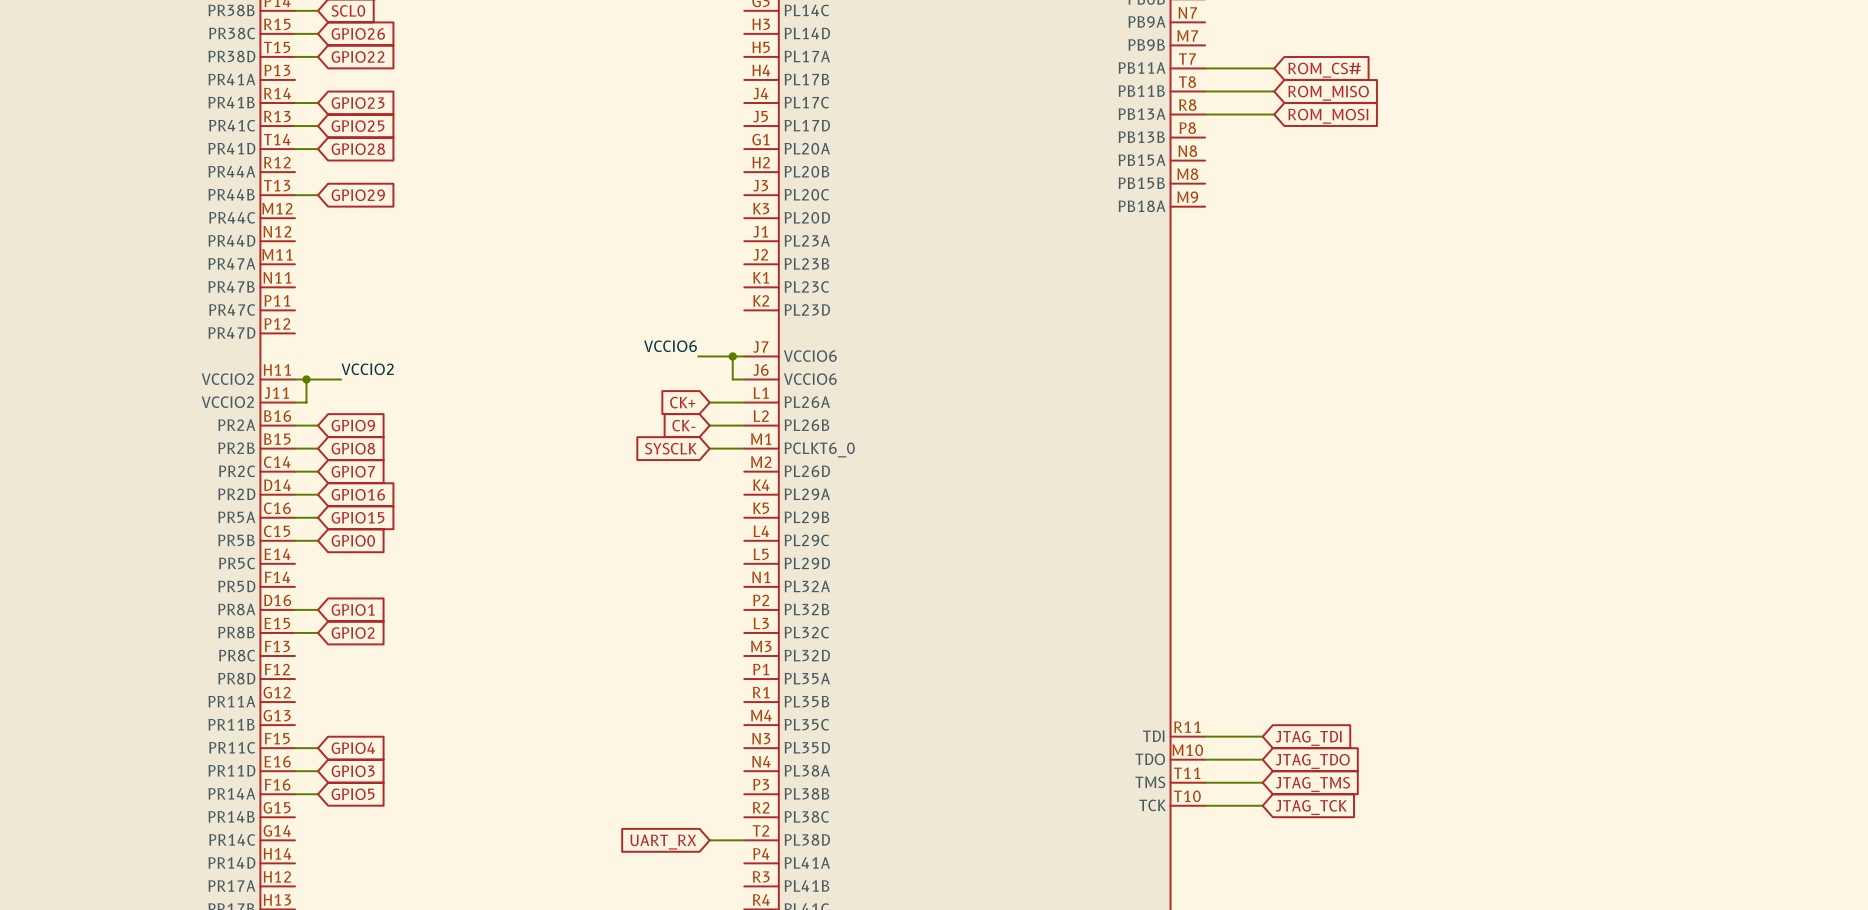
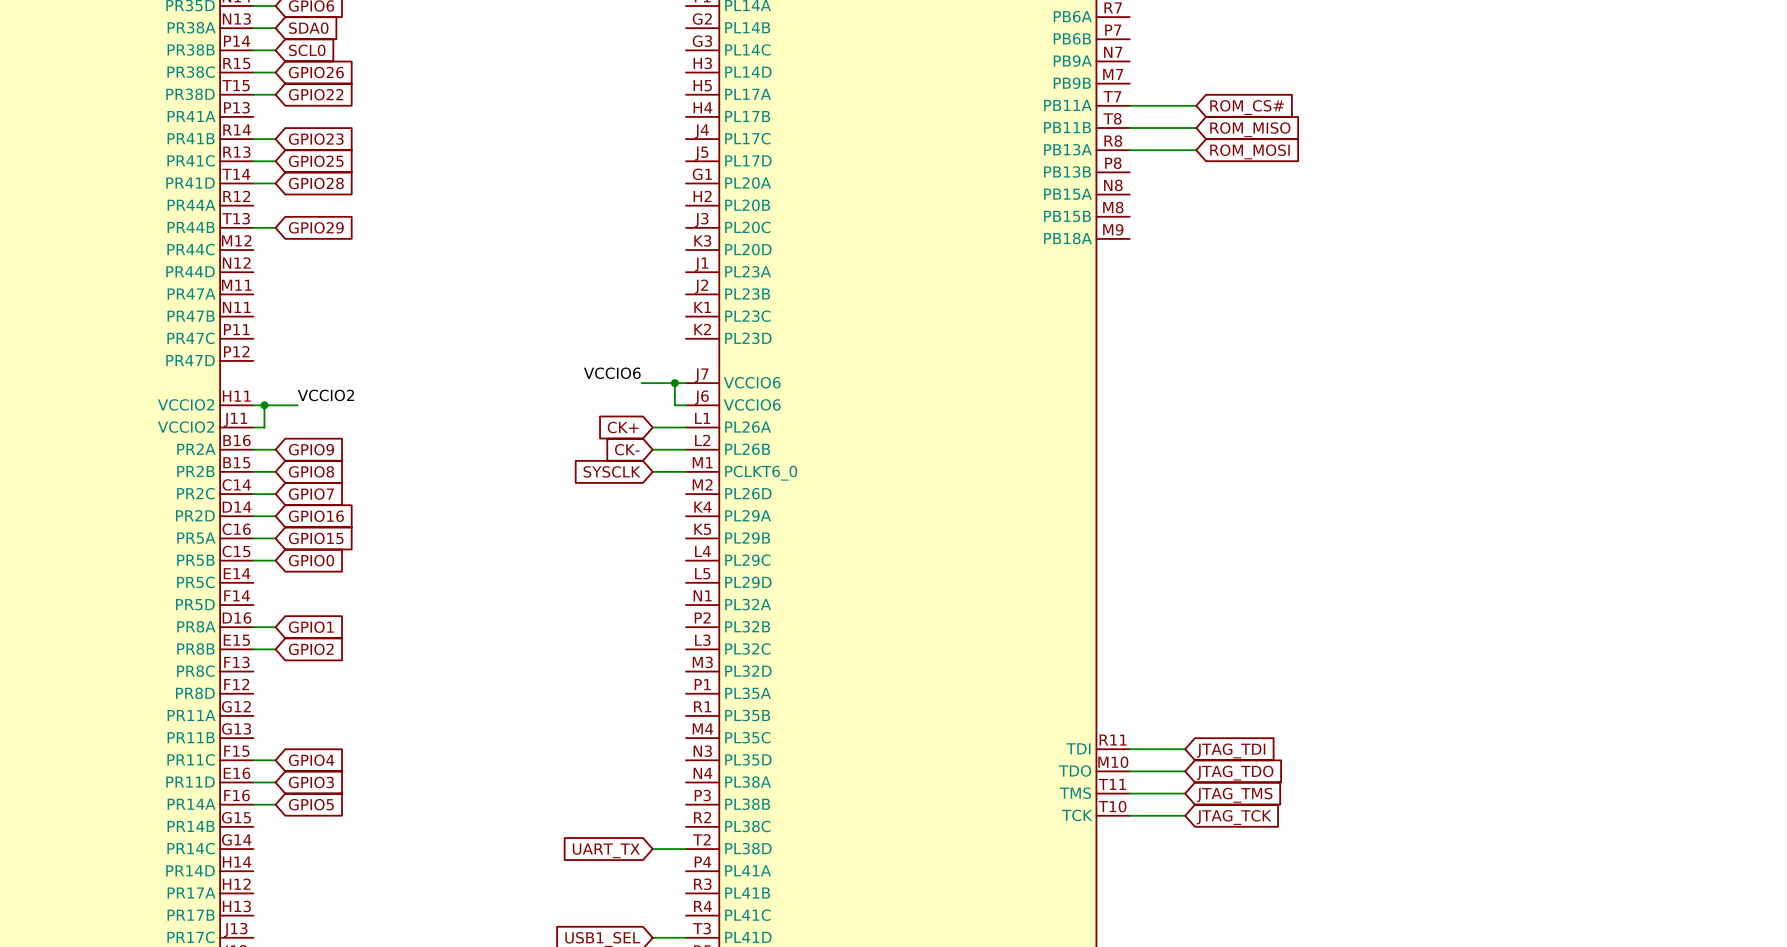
global label: UART_RX (663, 842) -> UART_TX (606, 850)

